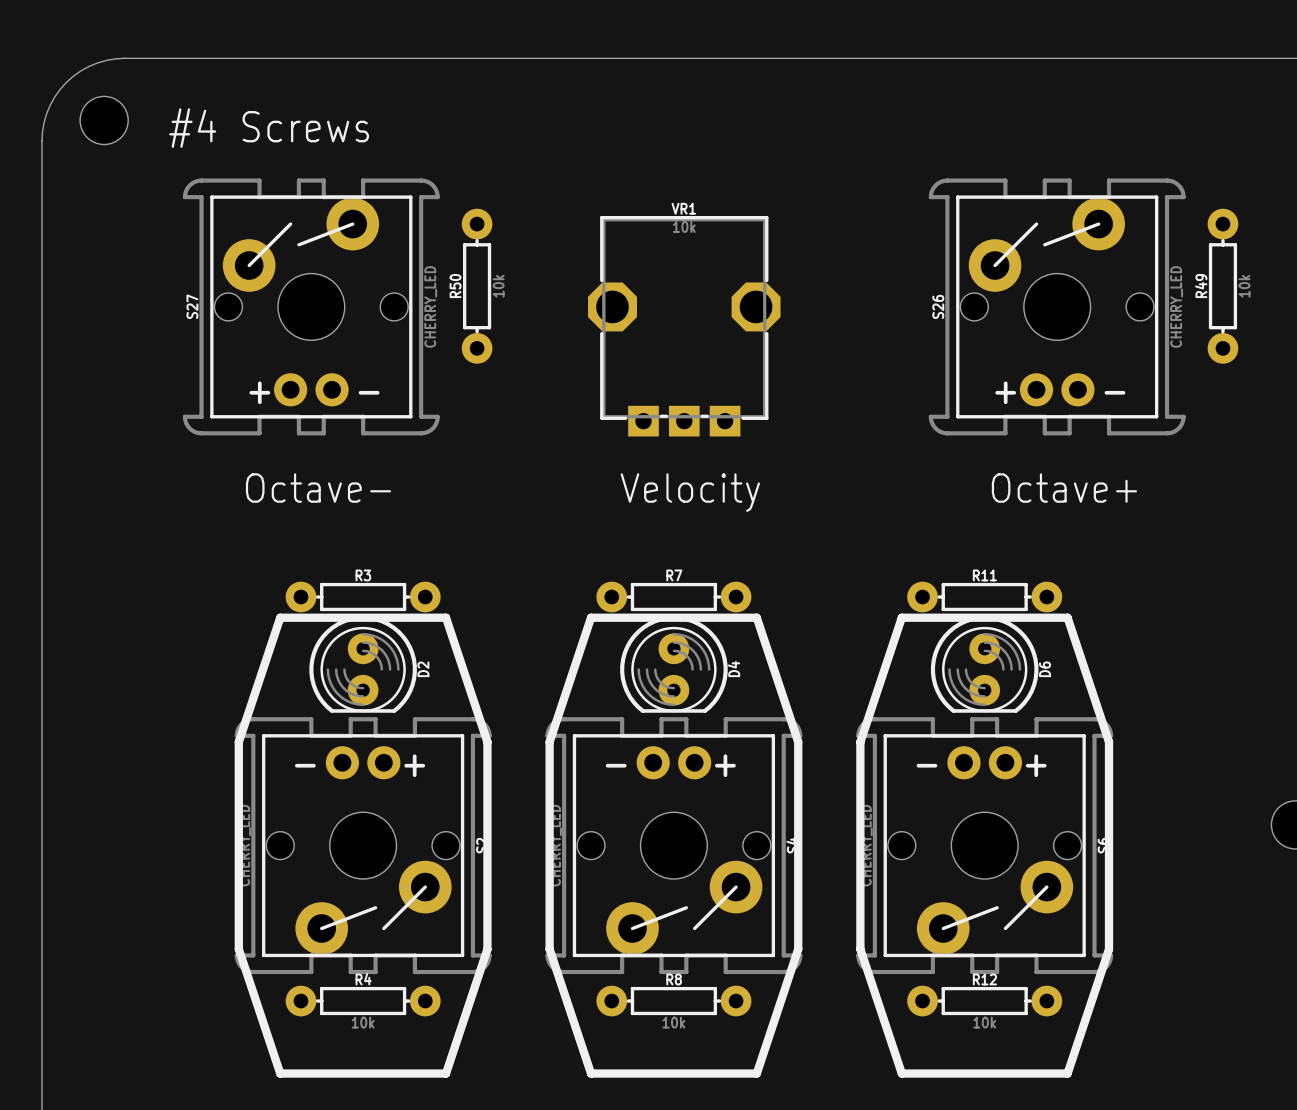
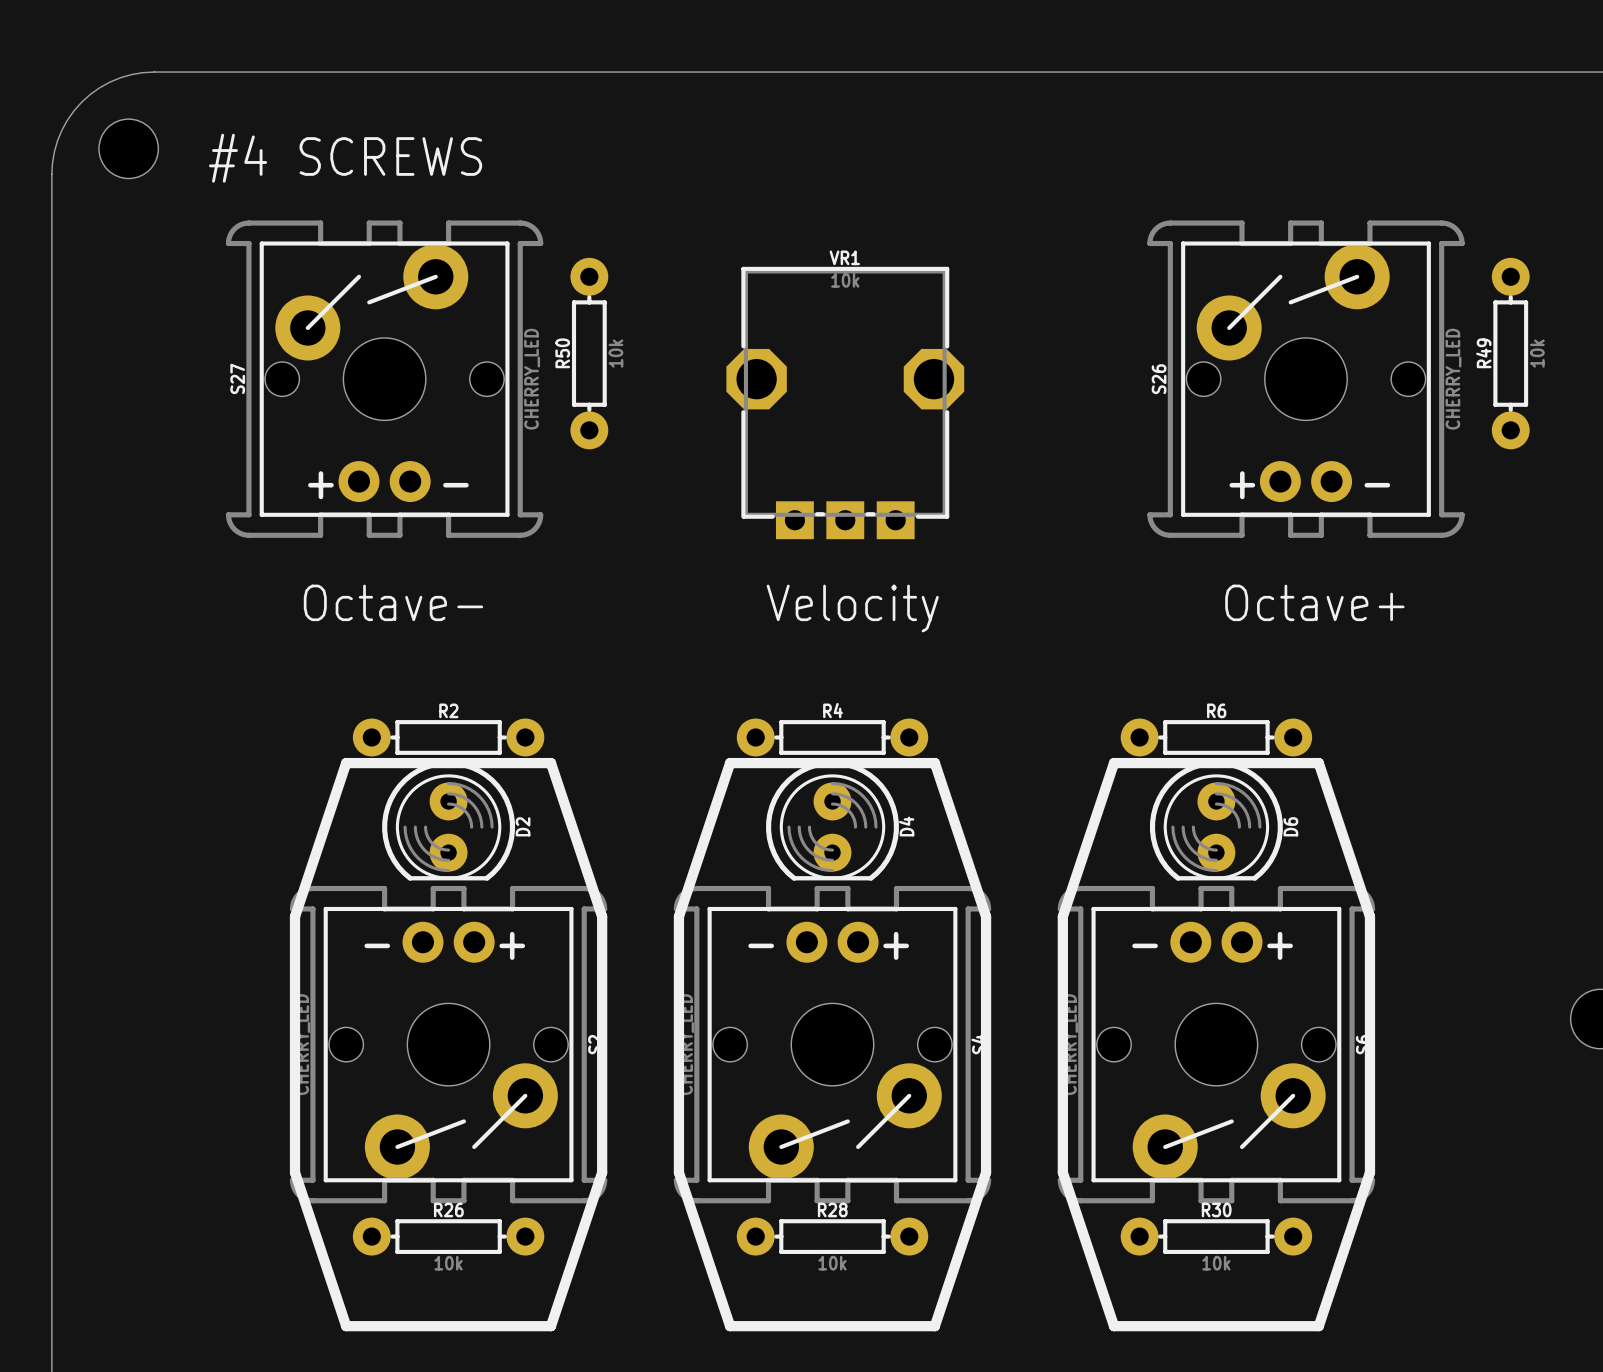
text: #4 Screws (269, 128) -> #4 SCREWS (345, 158)
R3 name: R3 (363, 575) -> R2 (448, 710)
R7 name: R7 (674, 575) -> R4 (833, 710)
R11 name: R11 (984, 575) -> R6 (1216, 710)
R4 name: R4 (363, 979) -> R26 (448, 1209)
R8 name: R8 (674, 979) -> R28 (832, 1209)
R12 name: R12 (984, 979) -> R30 (1216, 1209)

